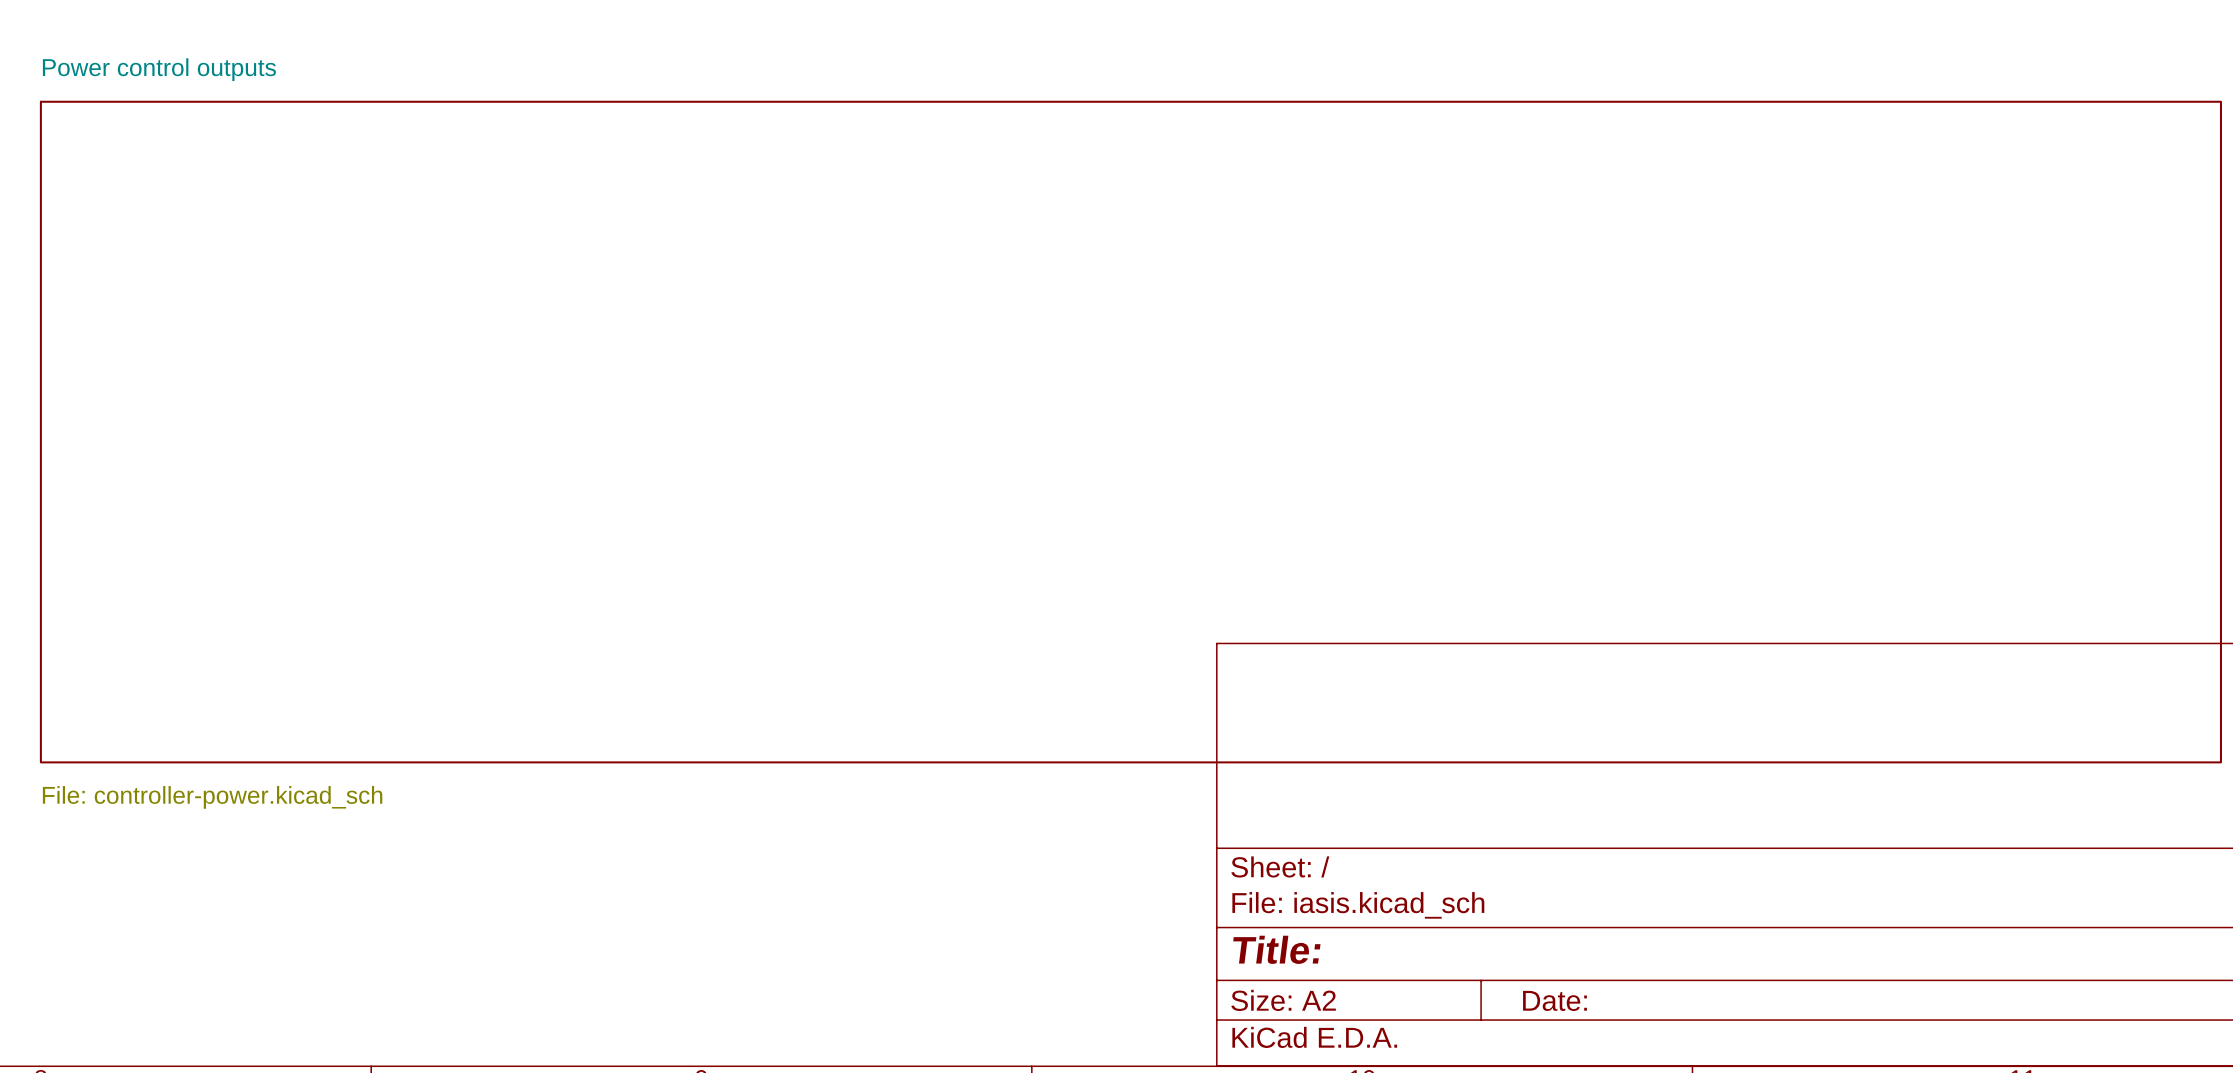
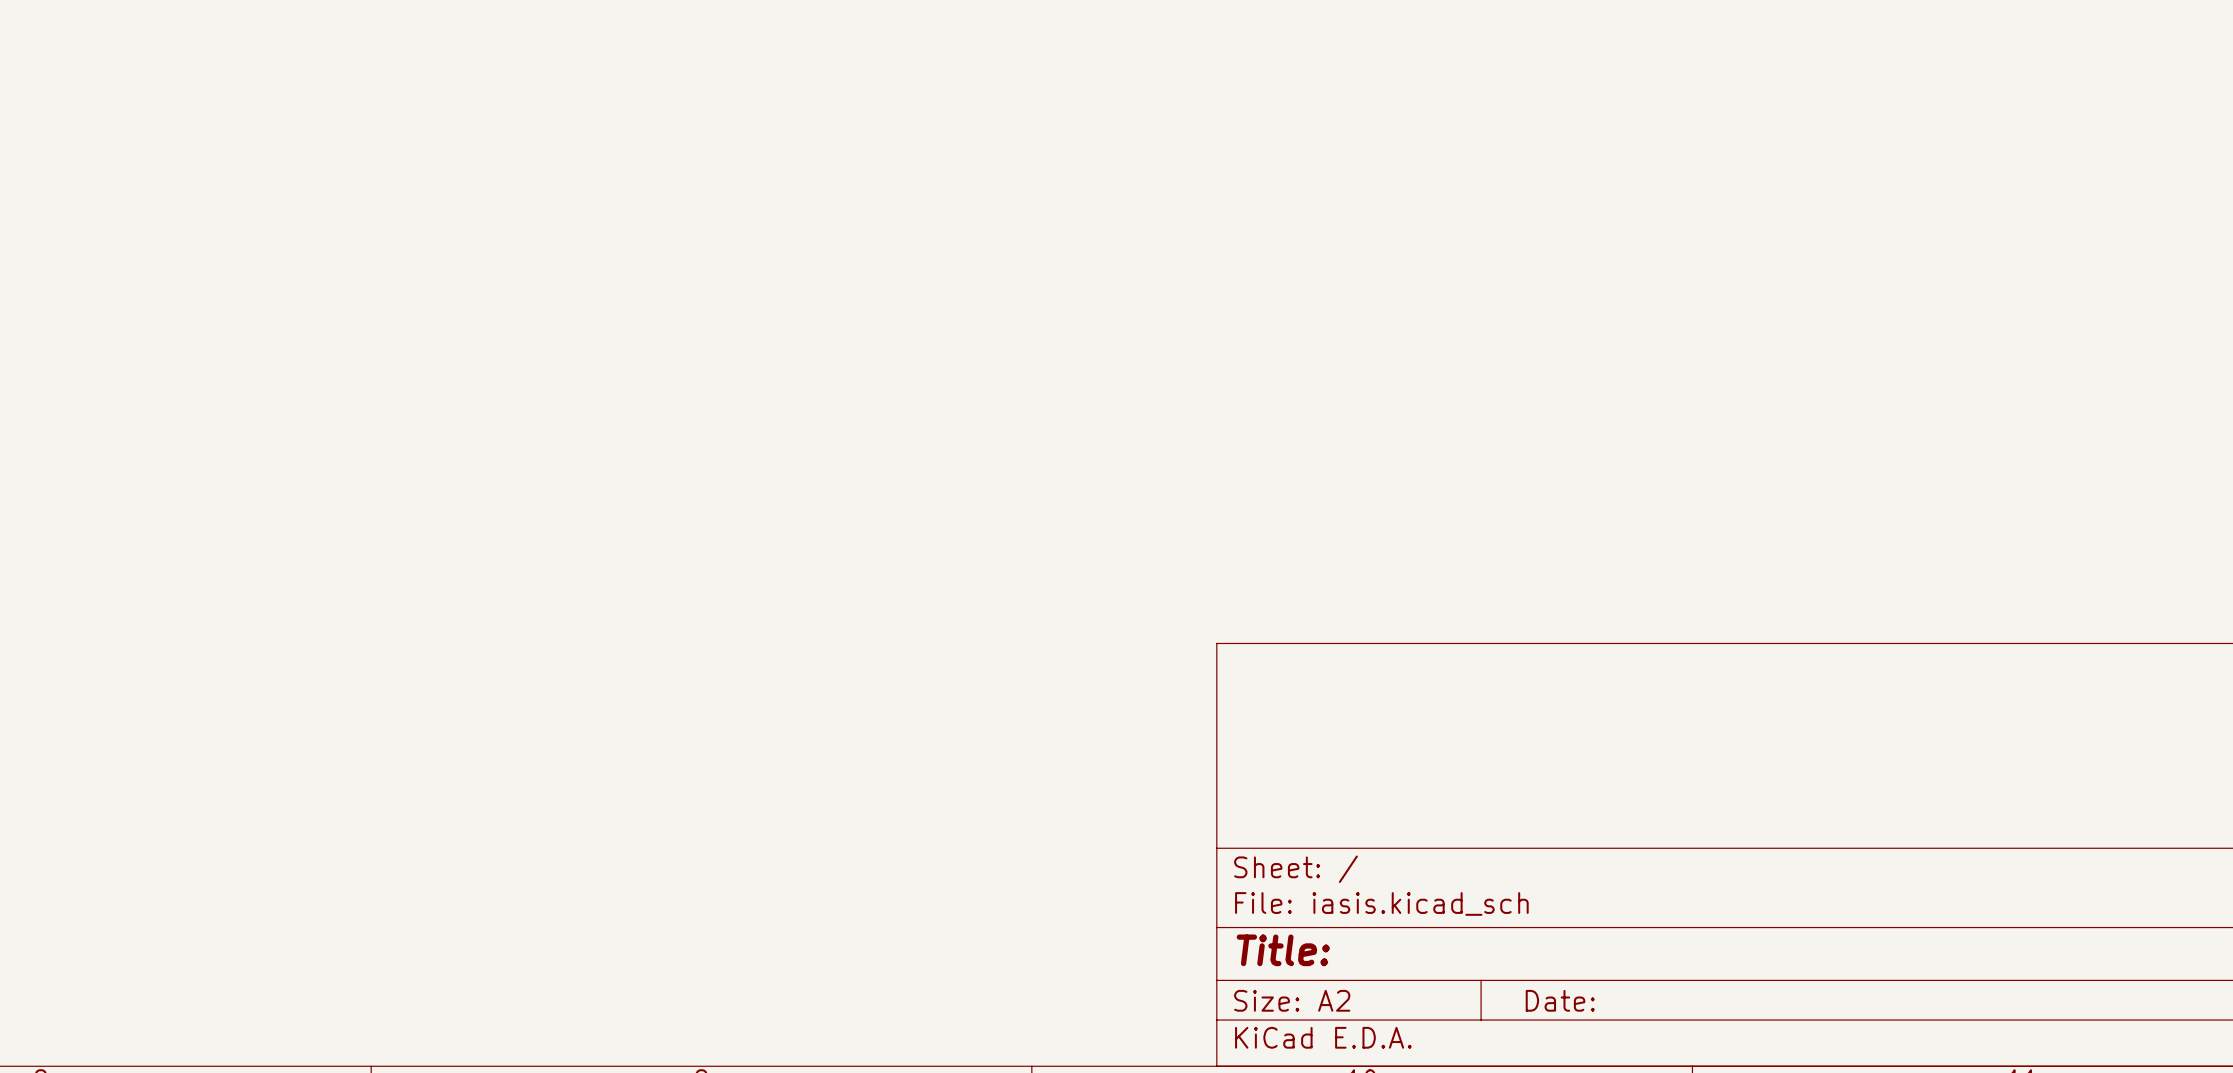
sheet Power control outputs: File: controller-power.kicad_sch (1130, 432) -> none

